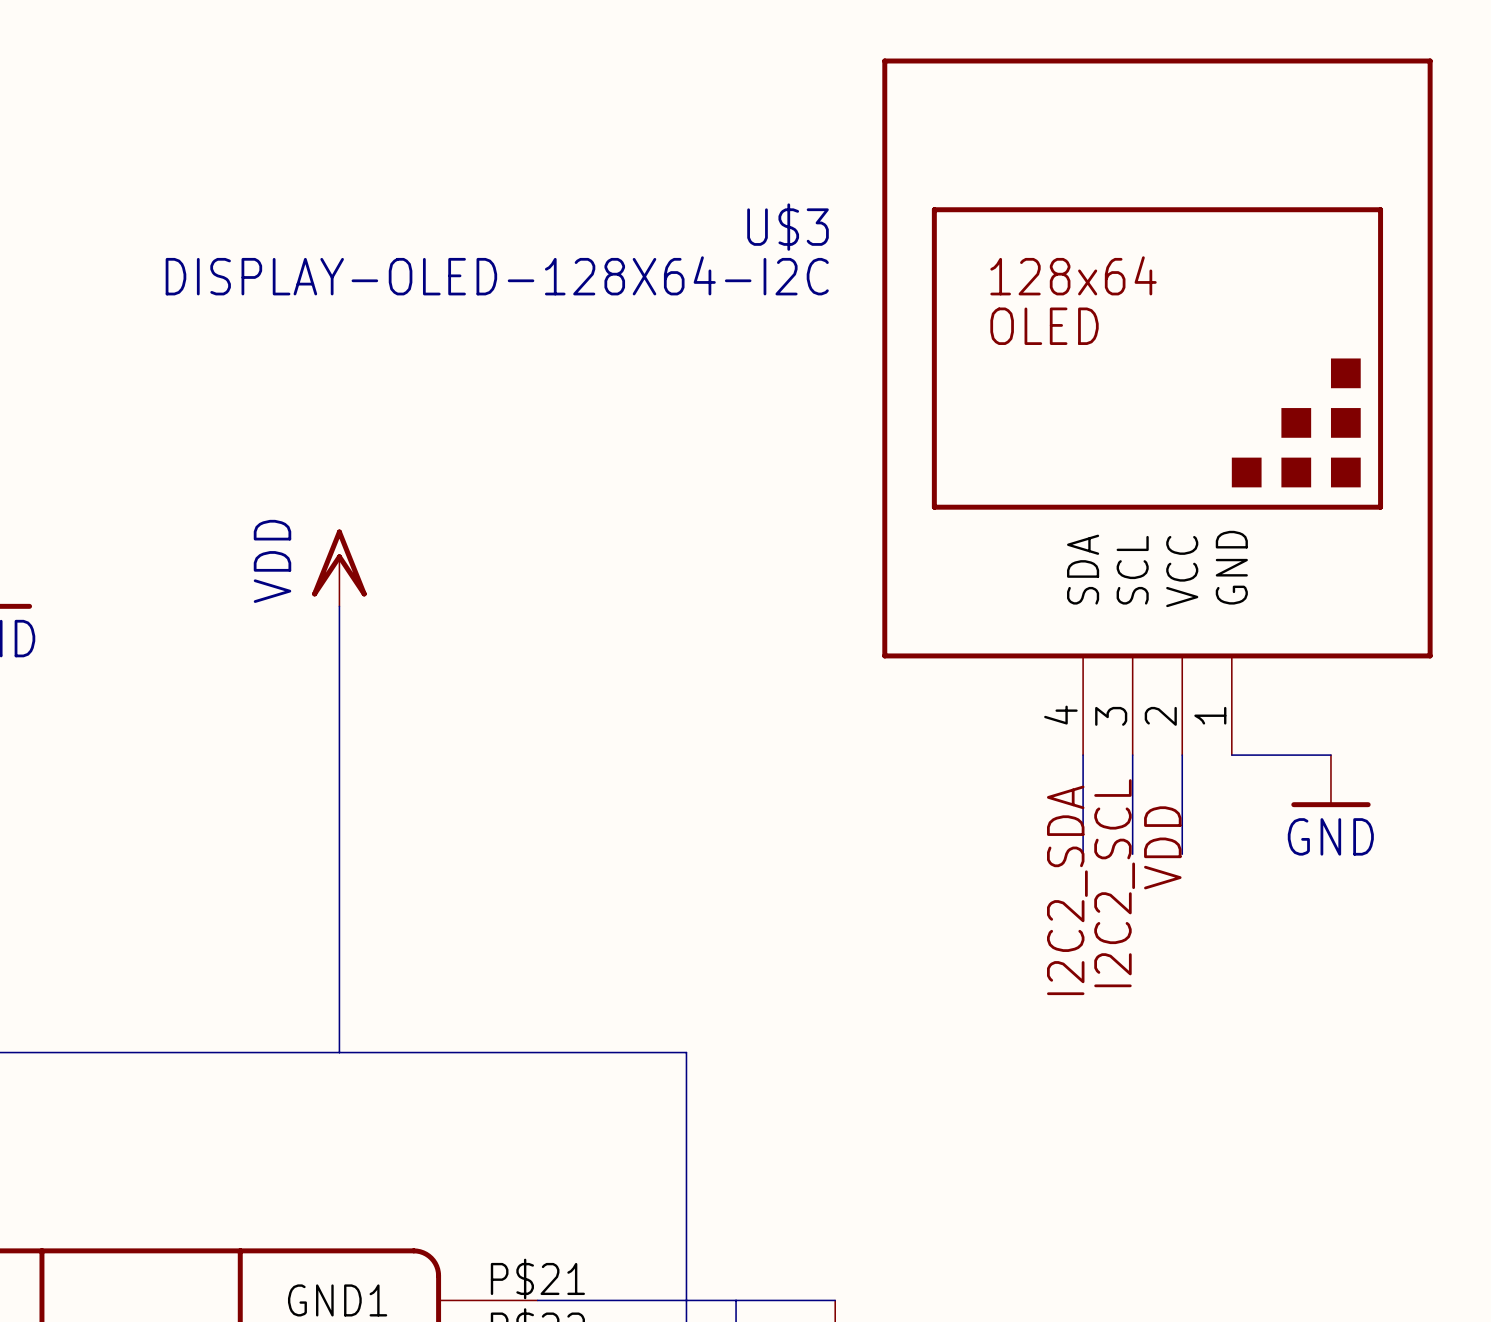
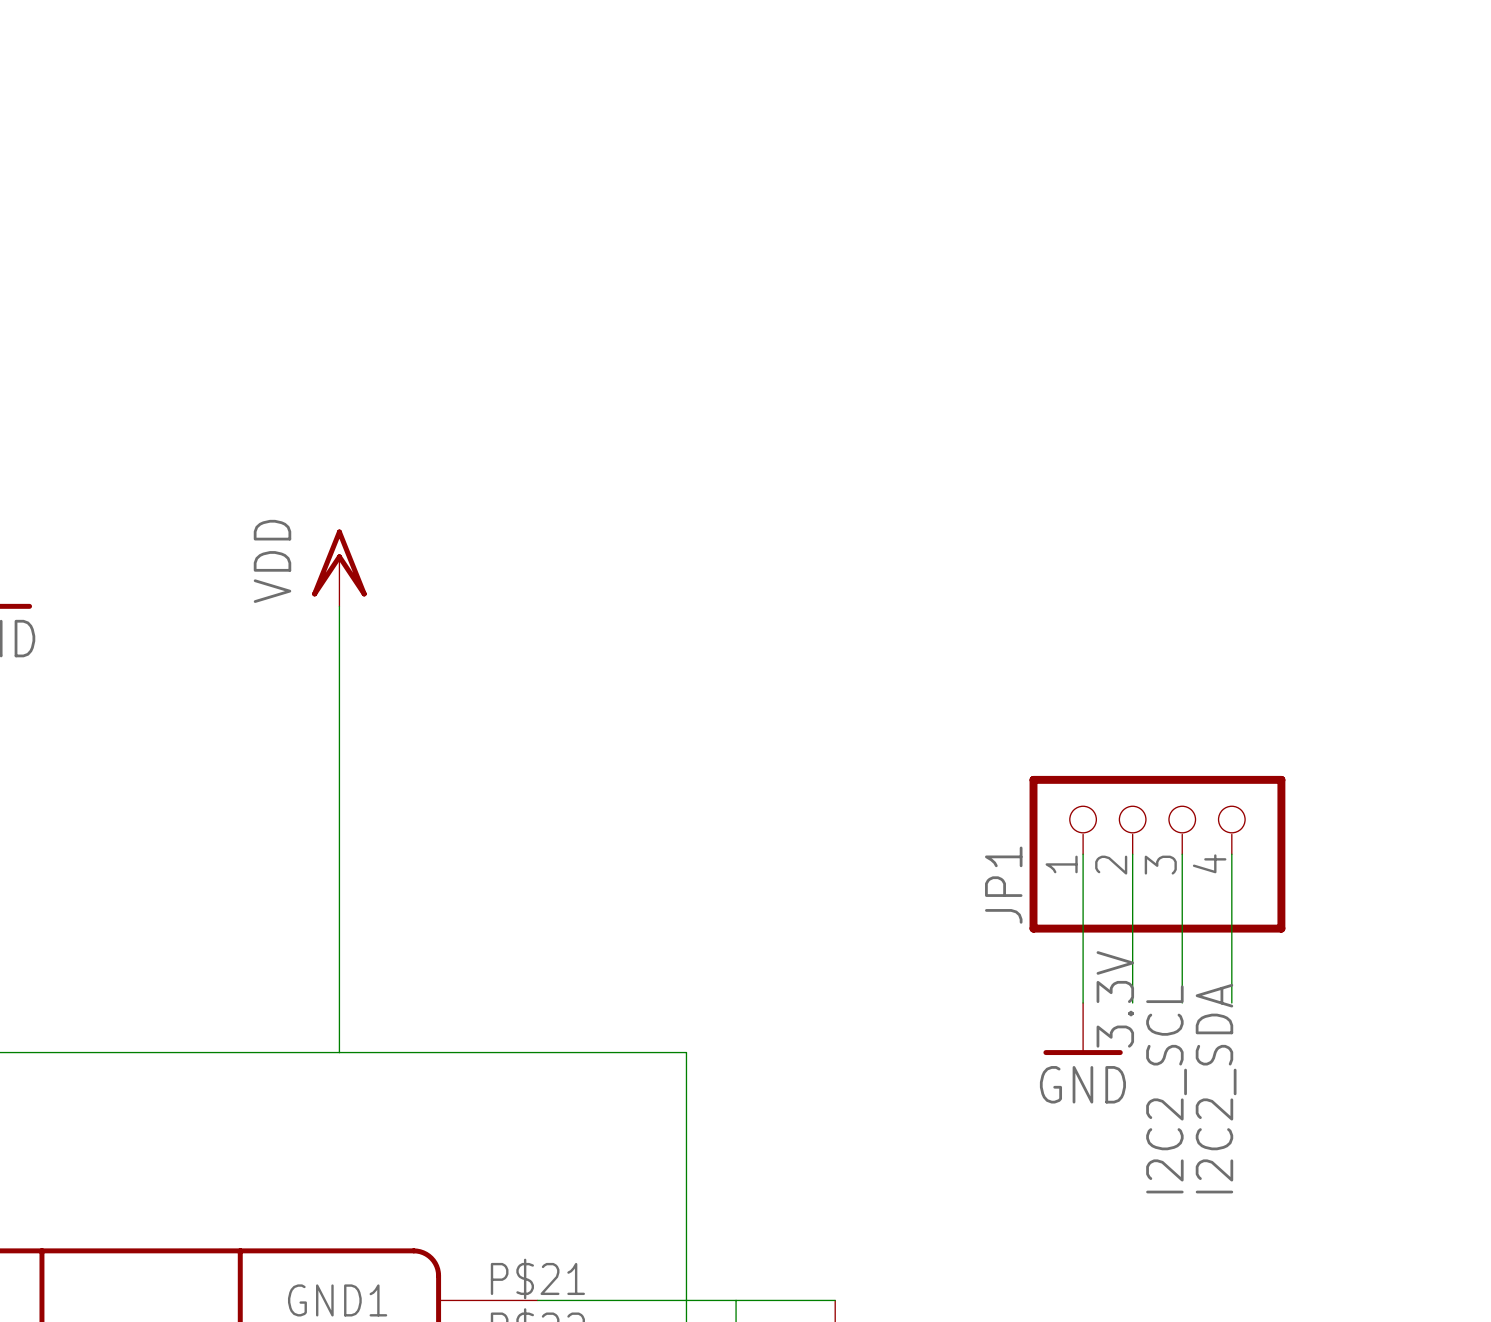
U$3: DISPLAY-OLED-128X64-I2C (1157, 406) -> none
wire: (1083, 755) (1083, 854) -> (1083, 1002) (1083, 854)
wire: (1132, 755) (1132, 854) -> (1132, 1002) (1132, 854)
wire: (1182, 755) (1182, 854) -> (1182, 1002) (1182, 854)
wire: (1231, 755) (1330, 755) -> none
power symbol position: GND (1330, 781) -> GND (1083, 1029)
label: VDD (1162, 847) -> none
JP1: none -> (1157, 854)
wire: none -> (1231, 854) (1231, 1002)
label position: I2C2_SCL (1114, 883) -> I2C2_SCL (1166, 1089)
label position: I2C2_SDA (1067, 890) -> I2C2_SDA (1216, 1088)
label: none -> 3.3V (1115, 999)

